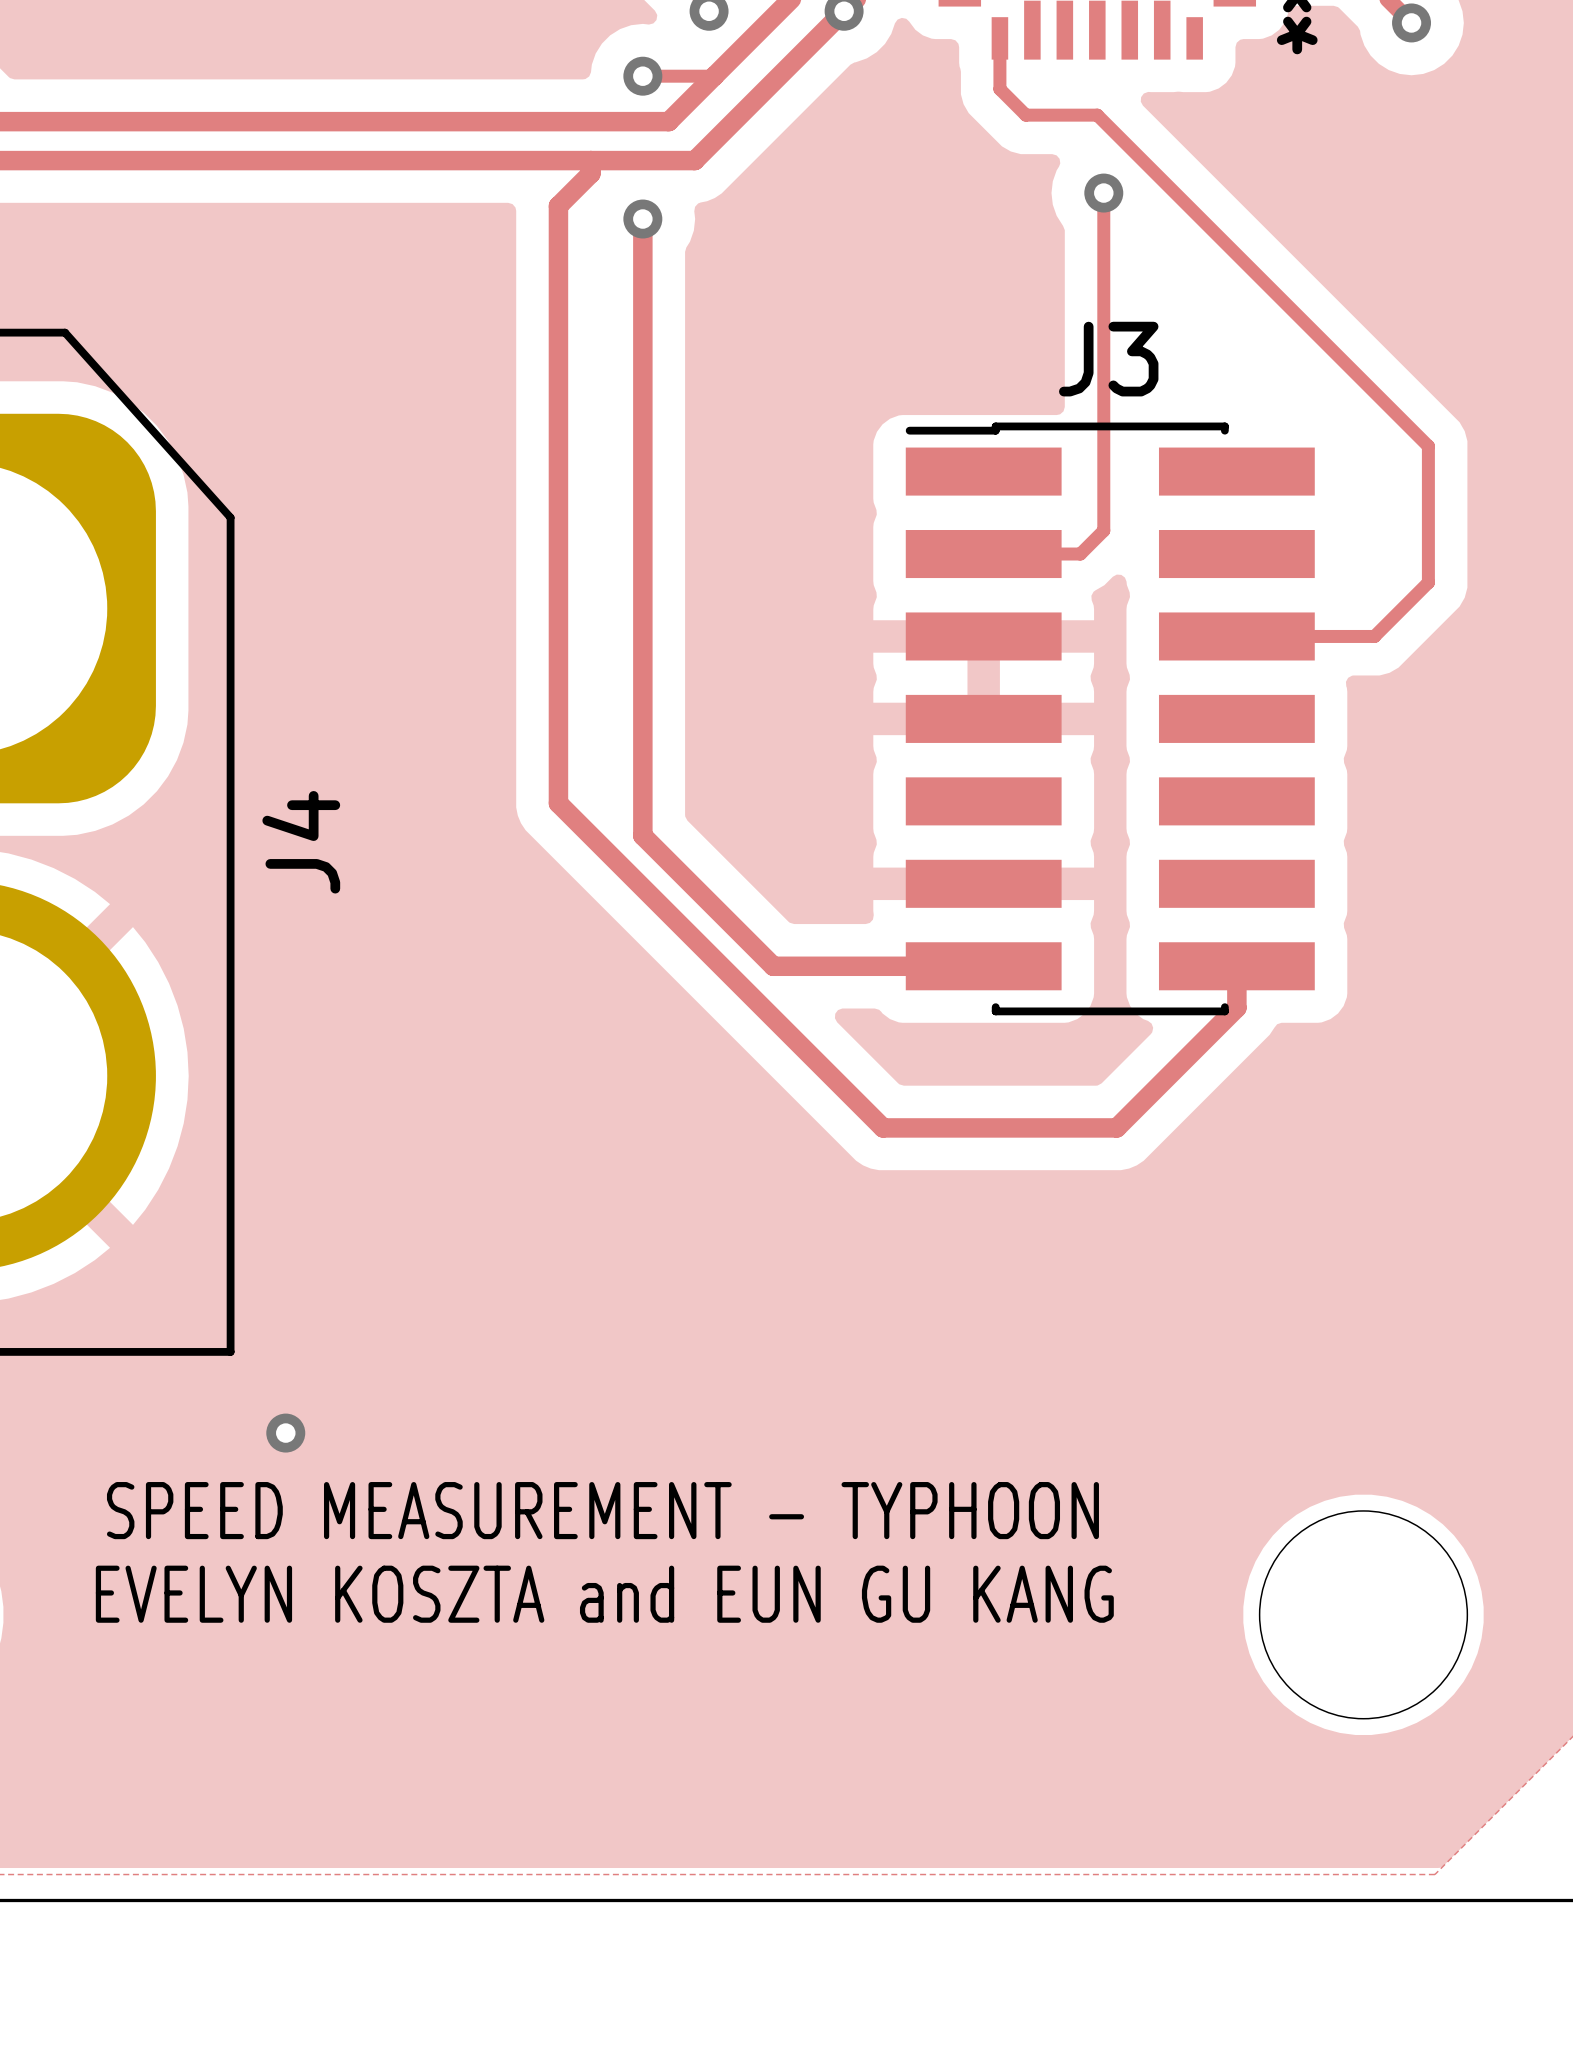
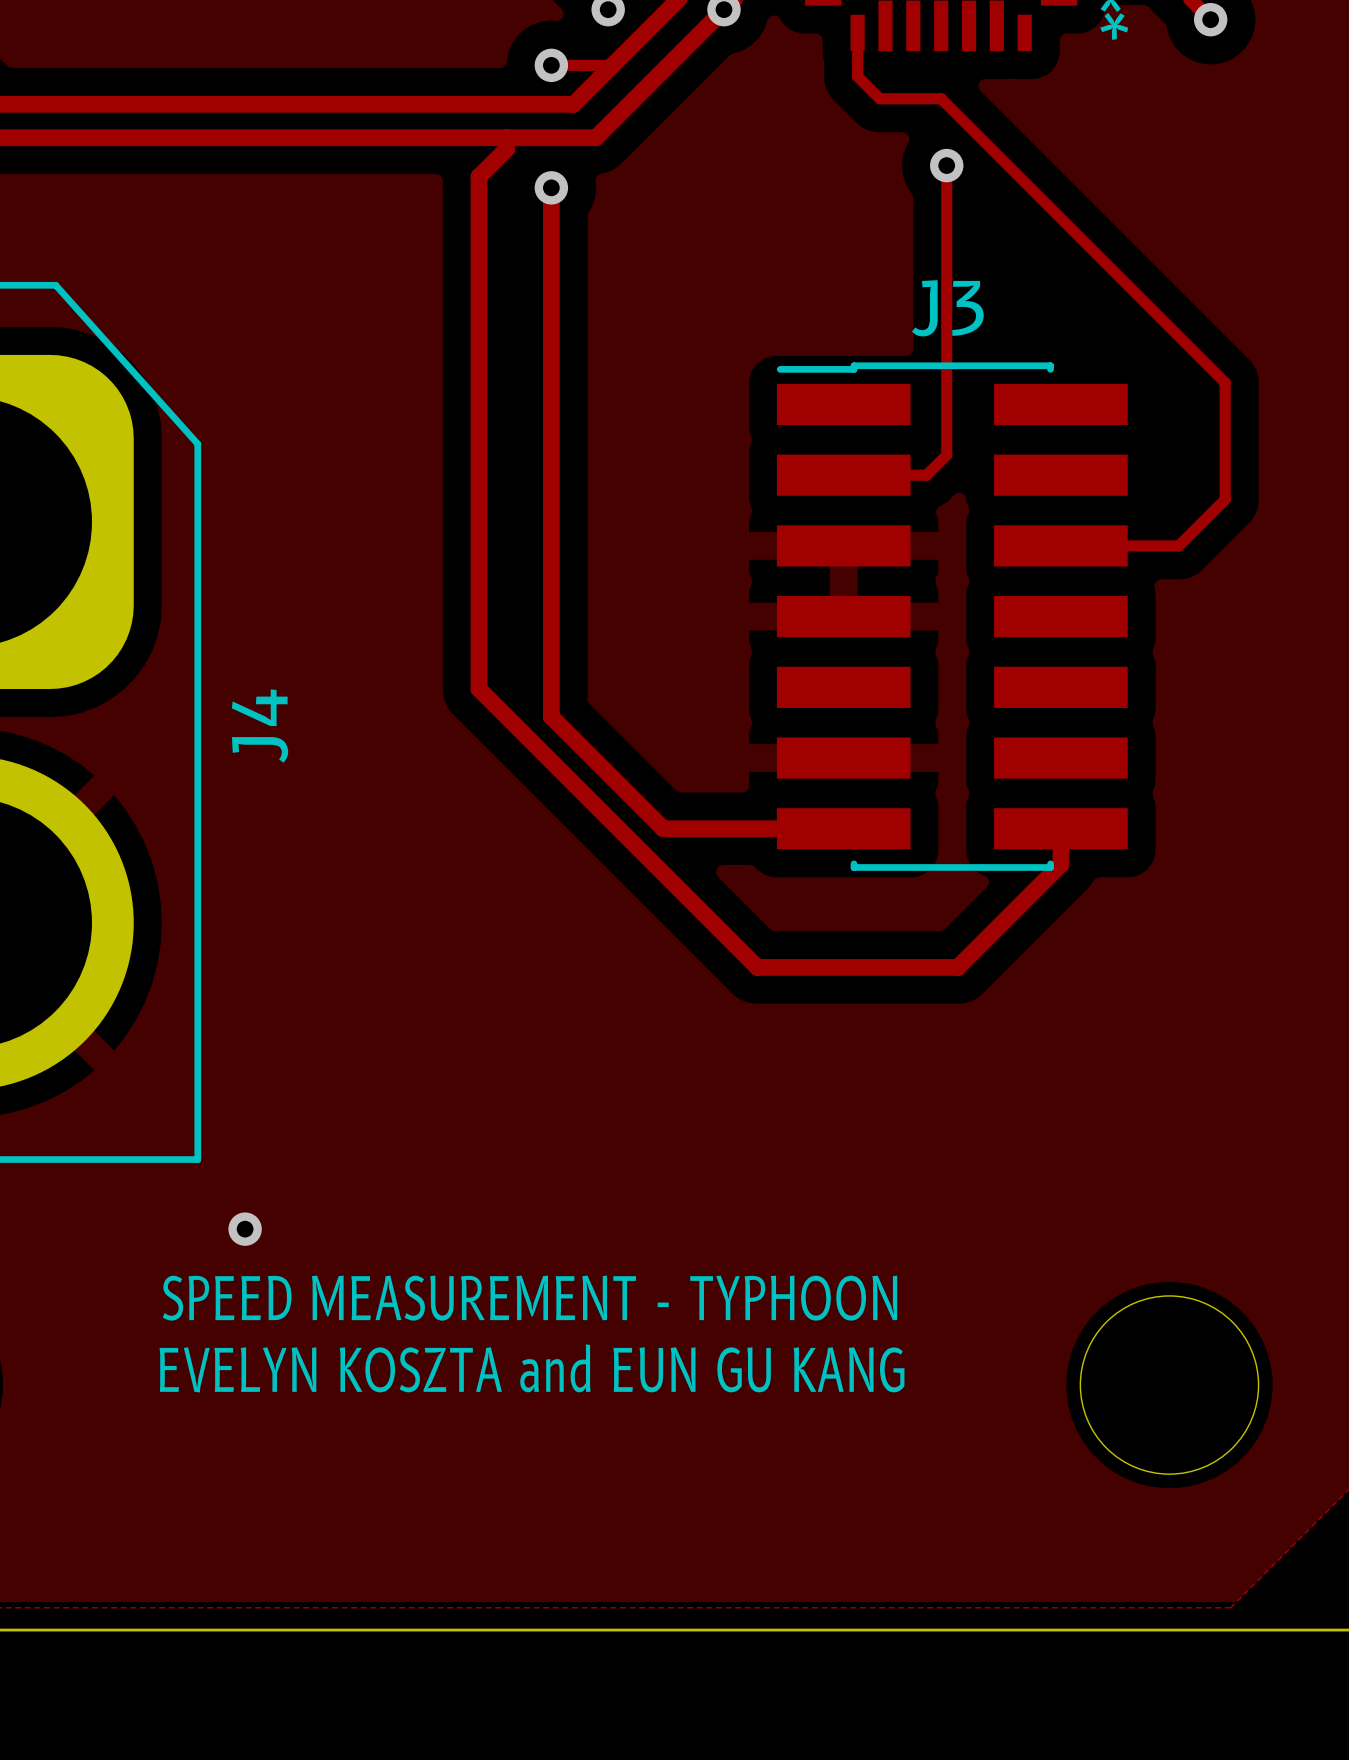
text position: SPEED MEASUREMENT - TYPHOON (602, 1510) -> SPEED MEASUREMENT - TYPHOON (529, 1298)
text position: EVELYN KOSZTA and EUN GU KANG (604, 1594) -> EVELYN KOSZTA and EUN GU KANG (531, 1368)

